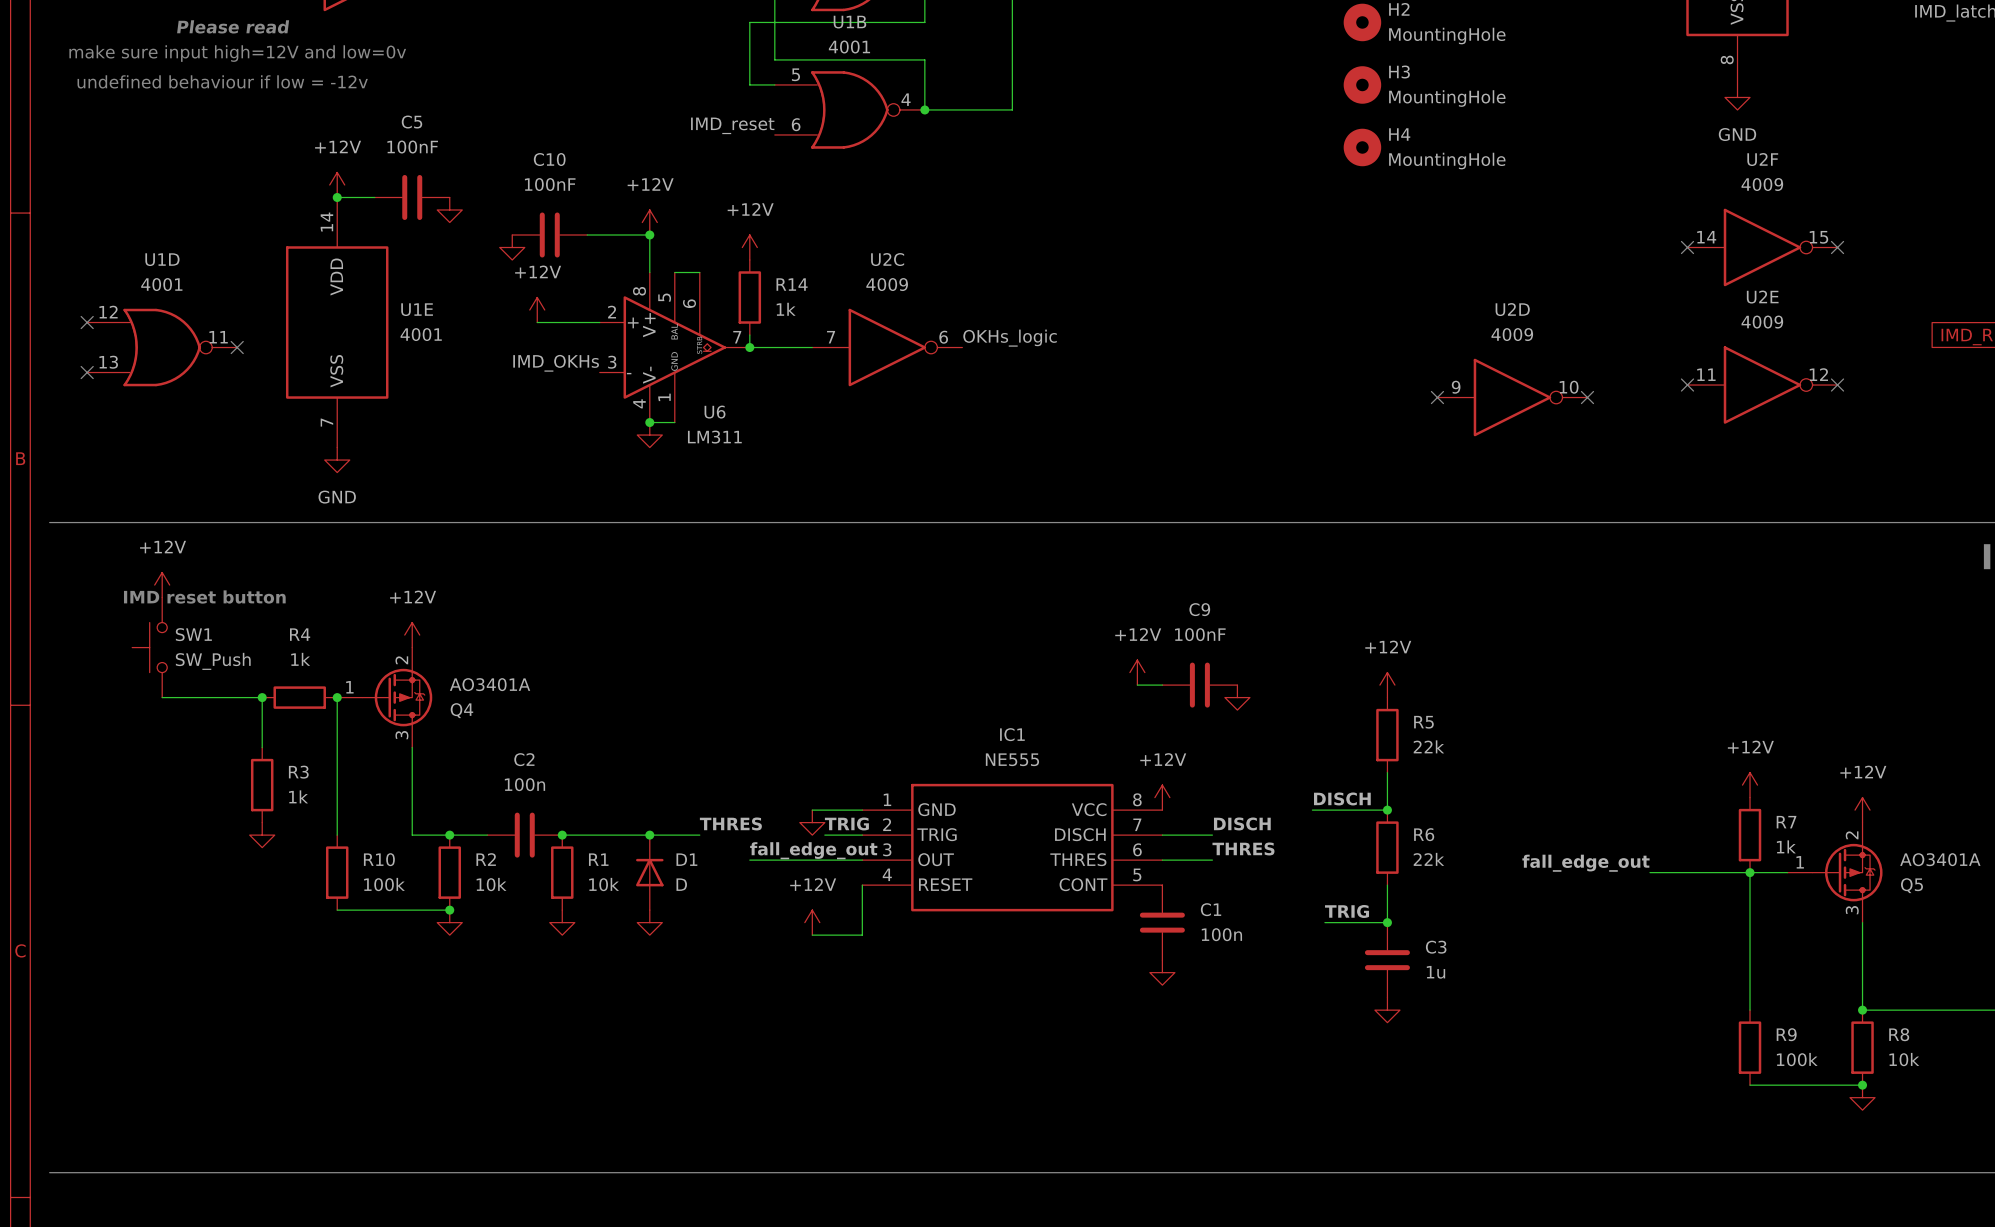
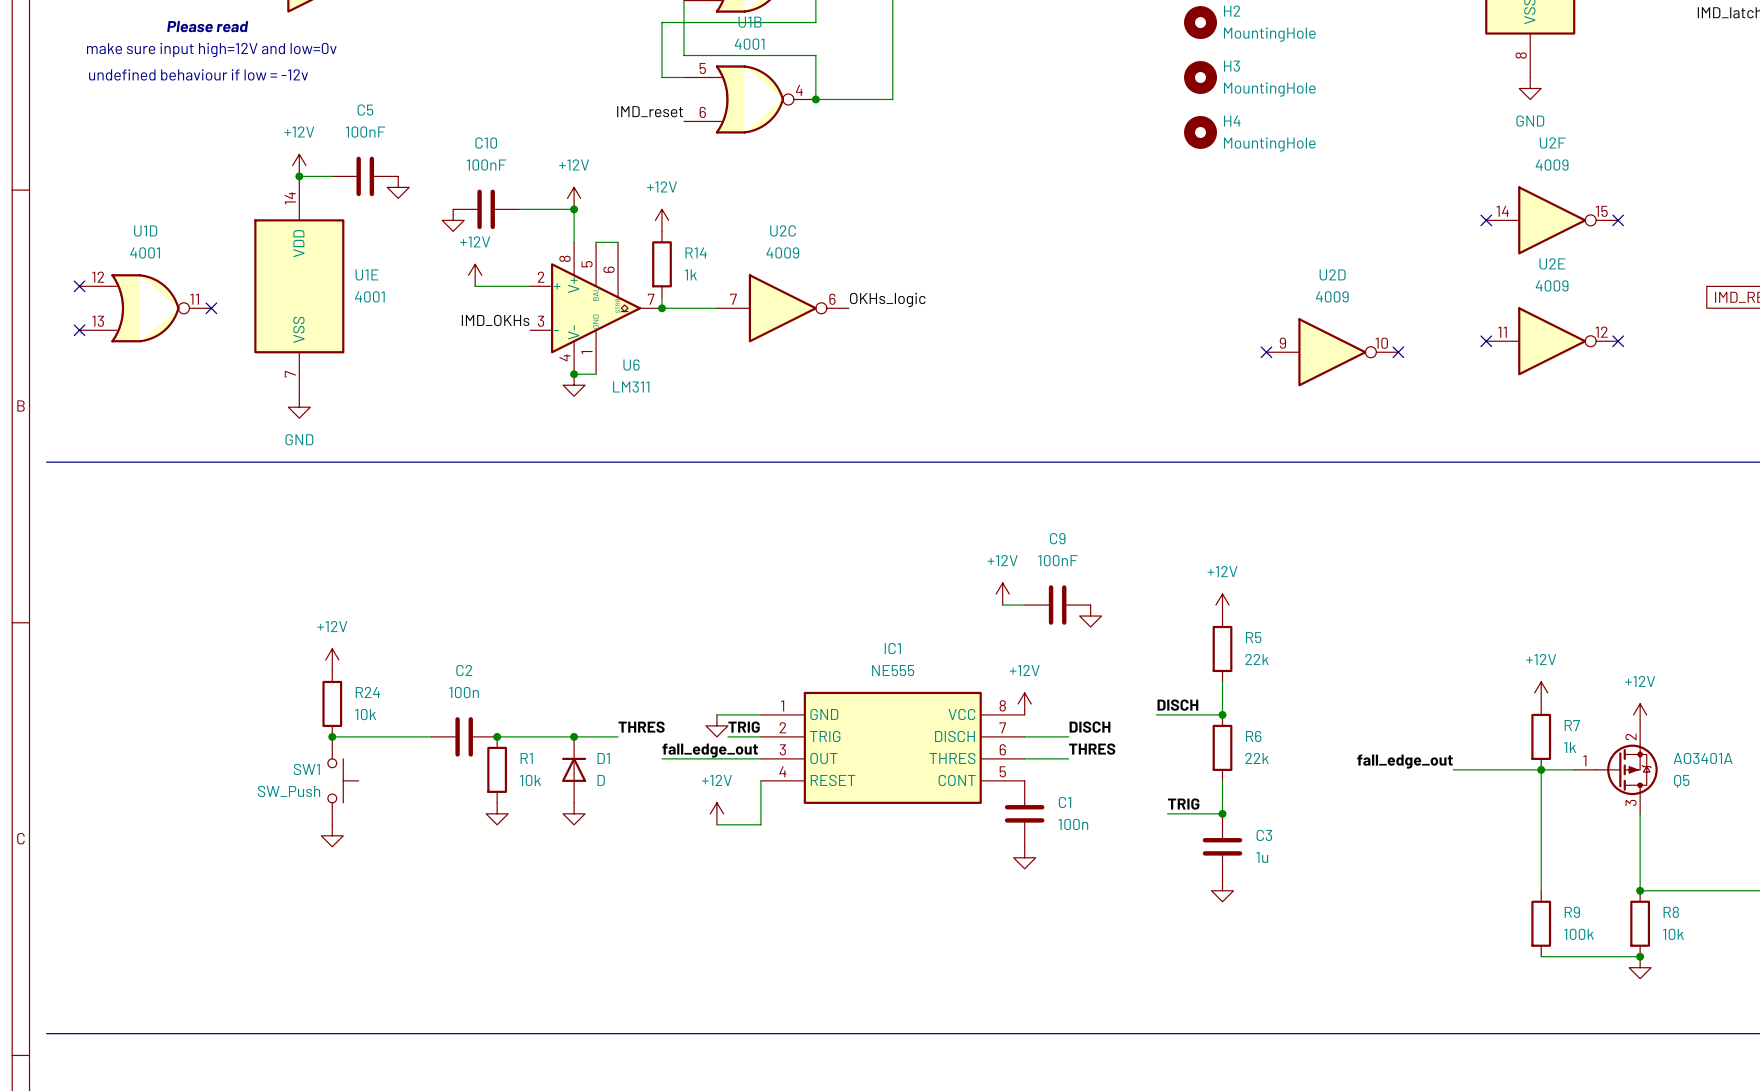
power symbol: +12V (162, 585) -> none
text: IMD reset button (204, 597) -> none
SW1 name position: SW1 (193, 634) -> SW1 (306, 769)
power symbol position: +12V (412, 635) -> +12V (332, 659)
SW1 rotation: 0° (149, 647) -> 180° (343, 780)
SW1 position: (149, 647) -> (343, 780)
SW1 value position: SW_Push (213, 661) -> SW_Push (288, 791)
wire: (162, 697) (262, 697) (262, 747) -> none
junction: (262, 697) -> none
R4: 1k (299, 697) -> none
wire: (337, 697) (337, 835) -> none
junction: (337, 697) -> none
Q4: AO3401A (384, 697) -> none
wire: (412, 747) (412, 835) -> (332, 736) (365, 736)
R3: 1k (262, 785) -> none
R24: none -> 10k (332, 703)
power symbol: (262, 835) -> none
junction: none -> (332, 736)
junction: (449, 835) -> none
R10: 100k (337, 872) -> none
R2: 10k (449, 872) -> none
wire: (337, 910) (449, 910) -> none
junction: (449, 910) -> none
power symbol position: (449, 922) -> (332, 835)

